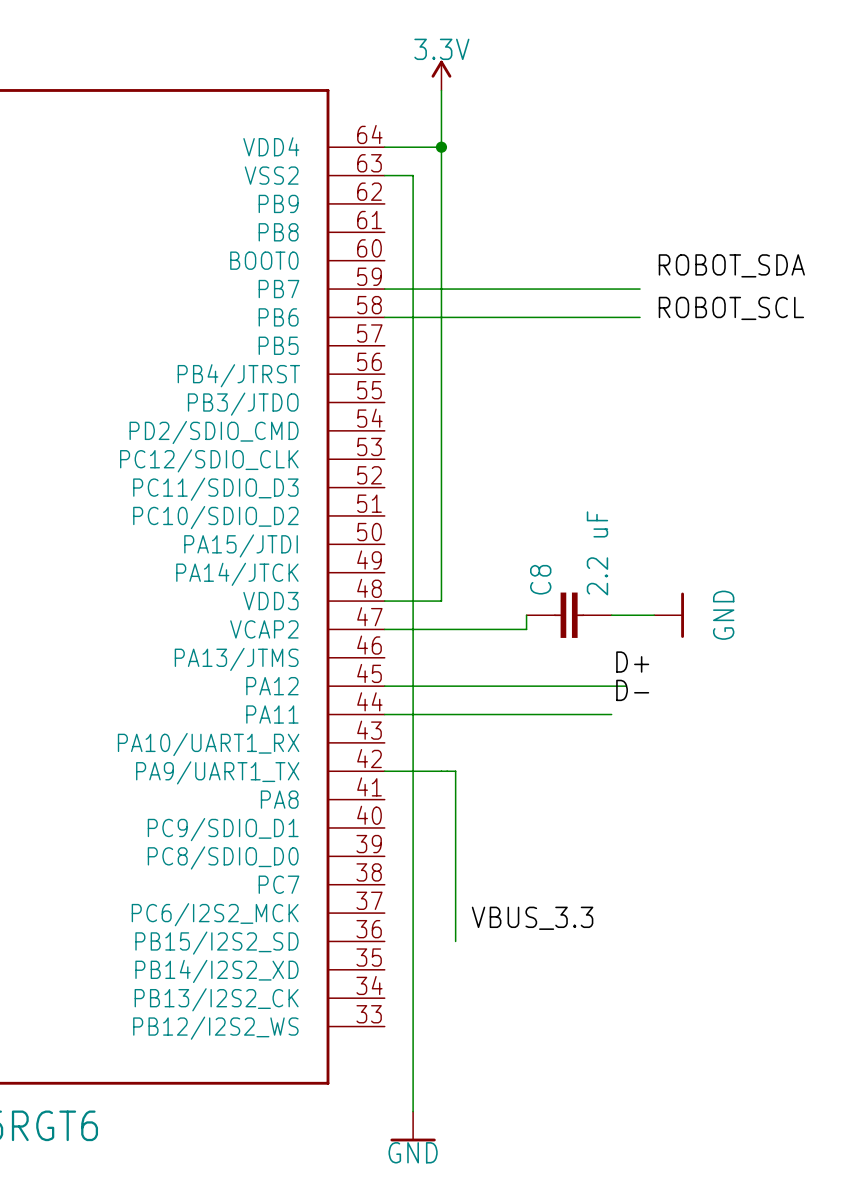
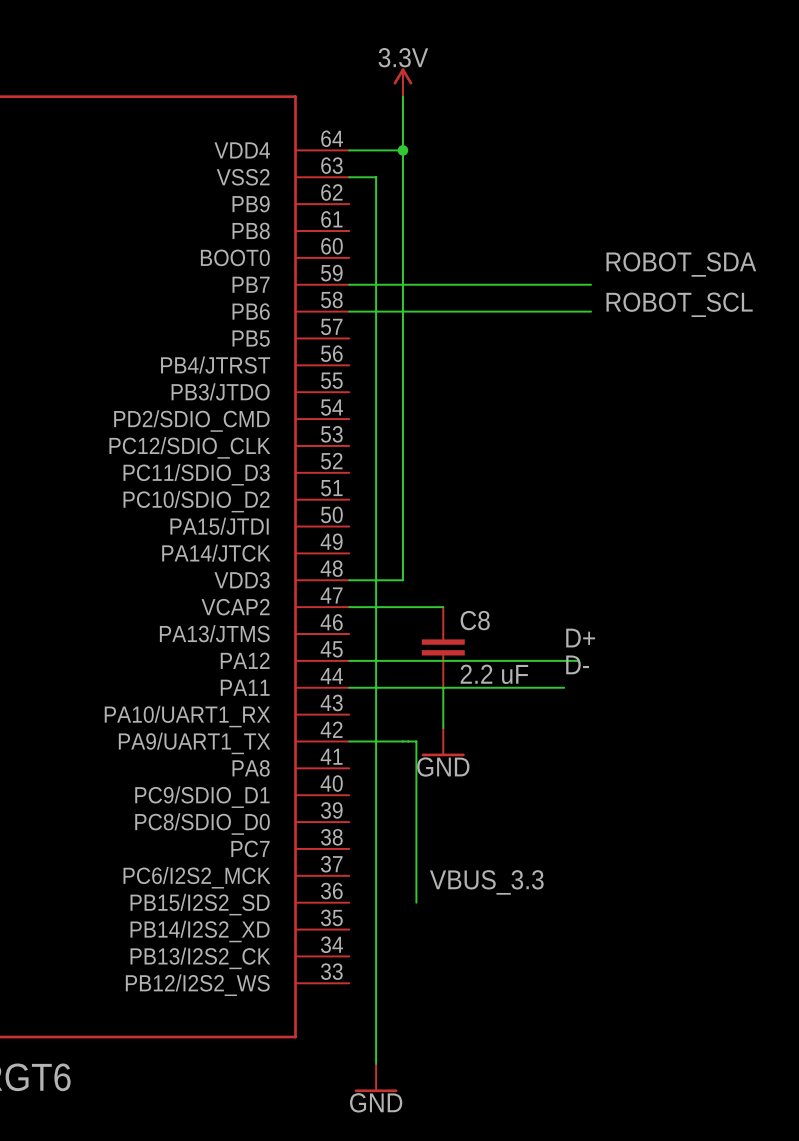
wire: (526, 615) (526, 629) (484, 629) -> none
C8 rotation: 0° (569, 615) -> 90° clockwise (443, 647)
C8 position: (569, 615) -> (443, 647)
wire: (611, 615) (654, 615) -> none
power symbol position: GND (669, 615) -> GND (443, 742)
power symbol rotation: 0° (682, 615) -> 90° clockwise (443, 754)
power symbol text position: GND (723, 615) -> GND (443, 767)
wire: none -> (443, 687) (443, 728)

